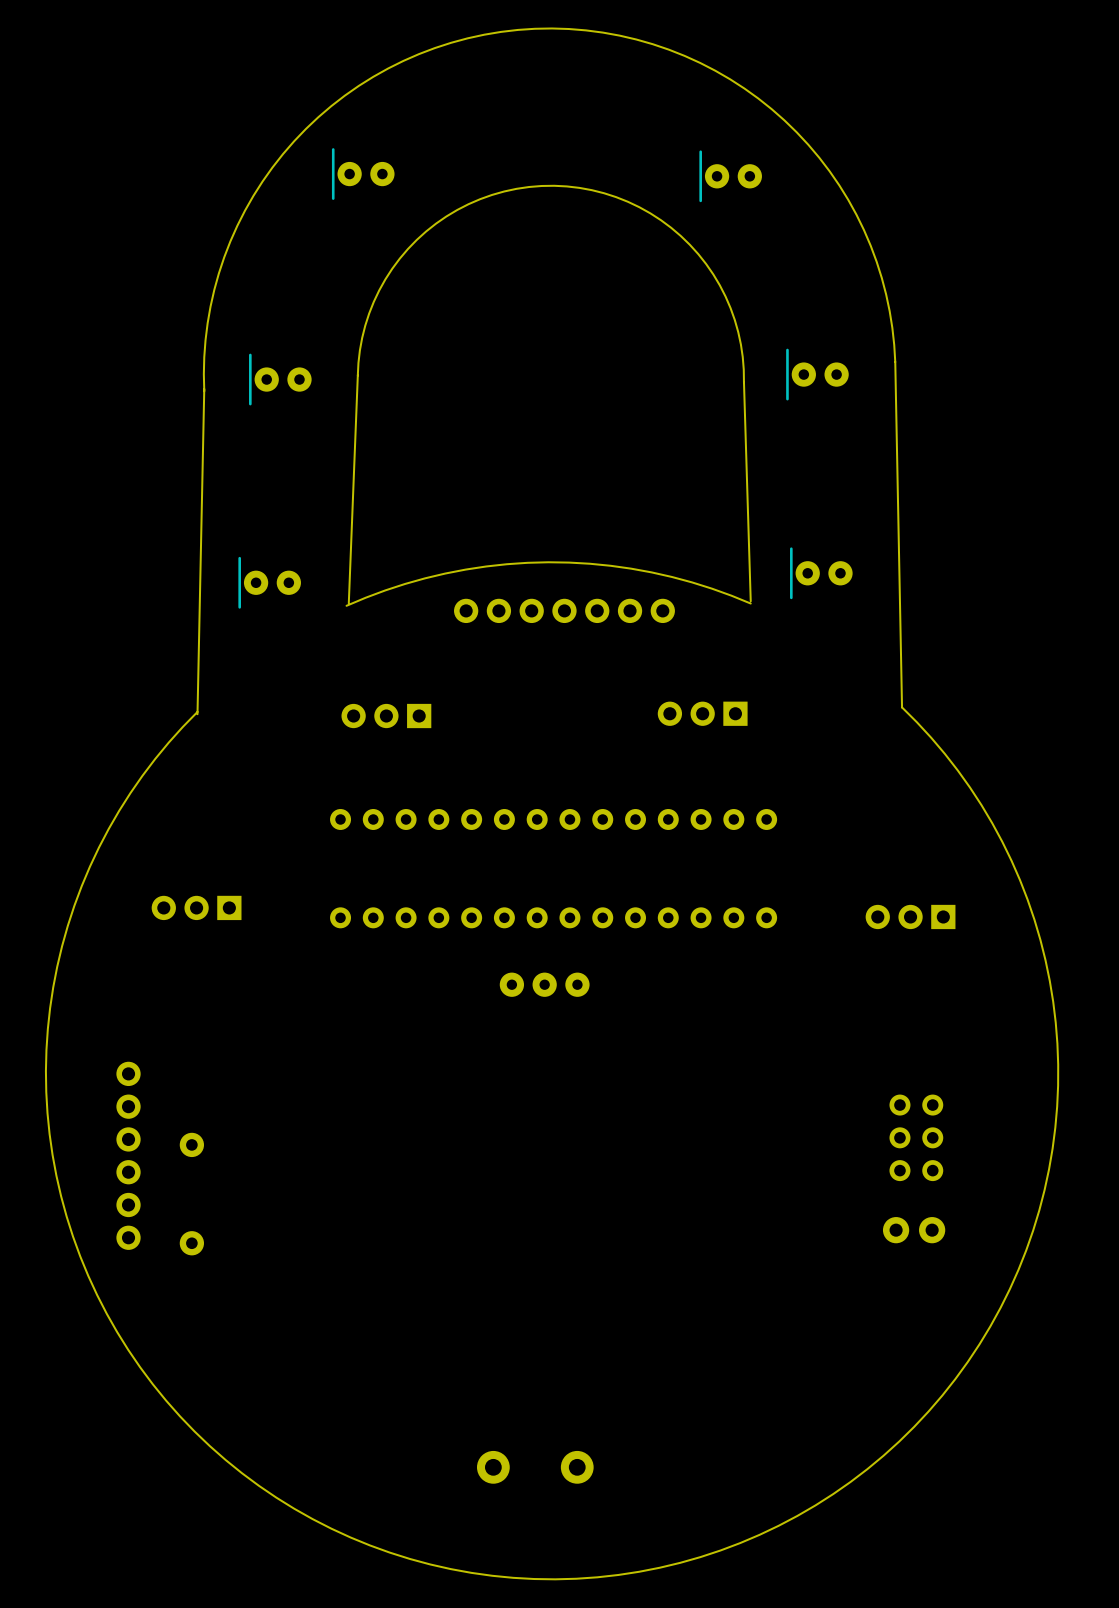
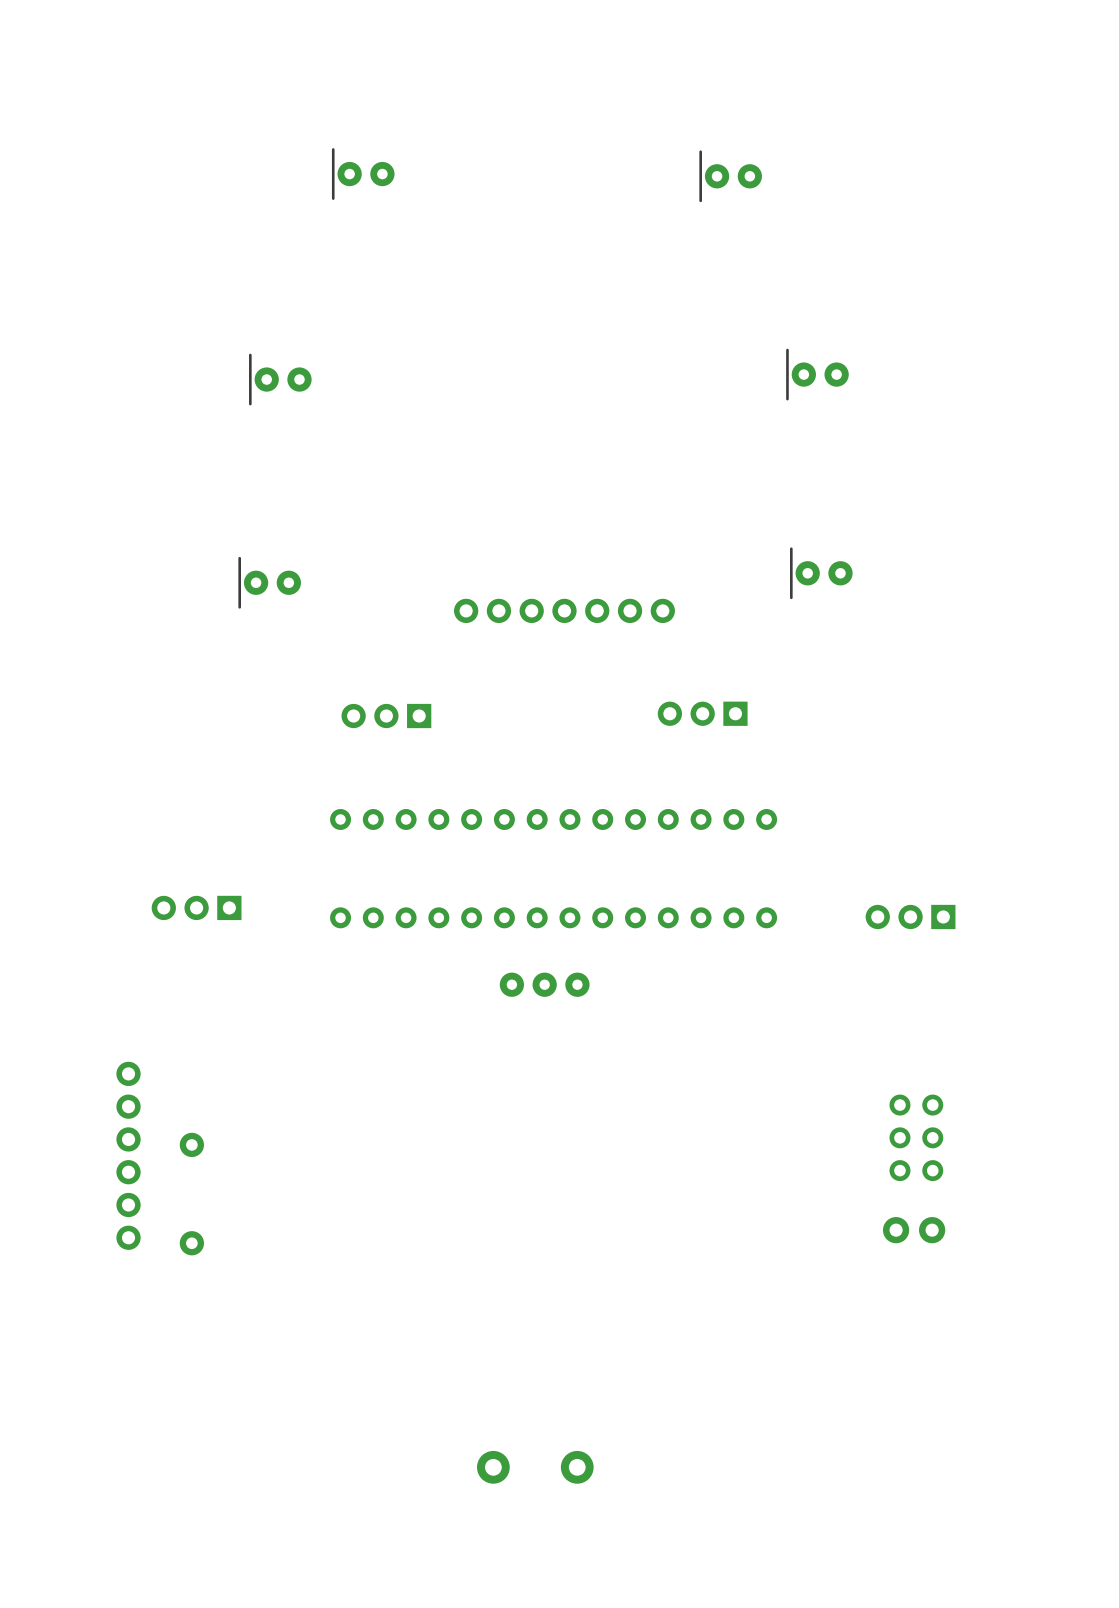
board edge: (204, 389) (197, 714) -> none
board edge: (204, 391) (205, 340) (210, 306) (218, 273) (237, 225) (262, 181) (283, 154) (305, 128) (344, 95) (388, 68) (434, 48) (484, 34) (534, 28) (586, 30) (619, 35) (652, 44) (684, 55) (715, 70) (758, 98) (796, 132) (819, 157) (839, 185) (856, 214) (870, 245) (881, 277) (892, 327) (895, 361) (902, 707) (931, 737) (957, 770) (992, 823) (1011, 860) (1027, 899) (1040, 939) (1049, 980) (1057, 1043) (1058, 1085) (1052, 1148) (1044, 1189) (1026, 1250) (1009, 1289) (979, 1344) (942, 1395) (899, 1441) (867, 1469) (815, 1505) (759, 1534) (720, 1550) (680, 1562) (639, 1571) (576, 1578) (534, 1579) (492, 1575) (450, 1569) (409, 1558) (350, 1537) (294, 1508) (258, 1485) (225, 1459) (180, 1416) (152, 1384) (117, 1332) (97, 1295) (73, 1236) (61, 1196) (49, 1134) (46, 1092) (46, 1050) (50, 1008) (57, 966) (74, 905) (89, 866) (108, 828) (130, 792) (155, 758) (197, 711) -> none
board edge: (750, 601) (742, 357) (738, 332) (725, 296) (713, 274) (689, 244) (671, 227) (650, 213) (627, 201) (604, 193) (579, 187) (554, 185) (529, 187) (504, 191) (480, 199) (457, 209) (436, 223) (416, 239) (392, 268) (379, 290) (365, 325) (358, 362) (348, 603) -> none
board edge: (750, 603) (711, 588) (651, 572) (610, 565) (548, 562) (486, 566) (445, 573) (385, 590) (346, 605) -> none

